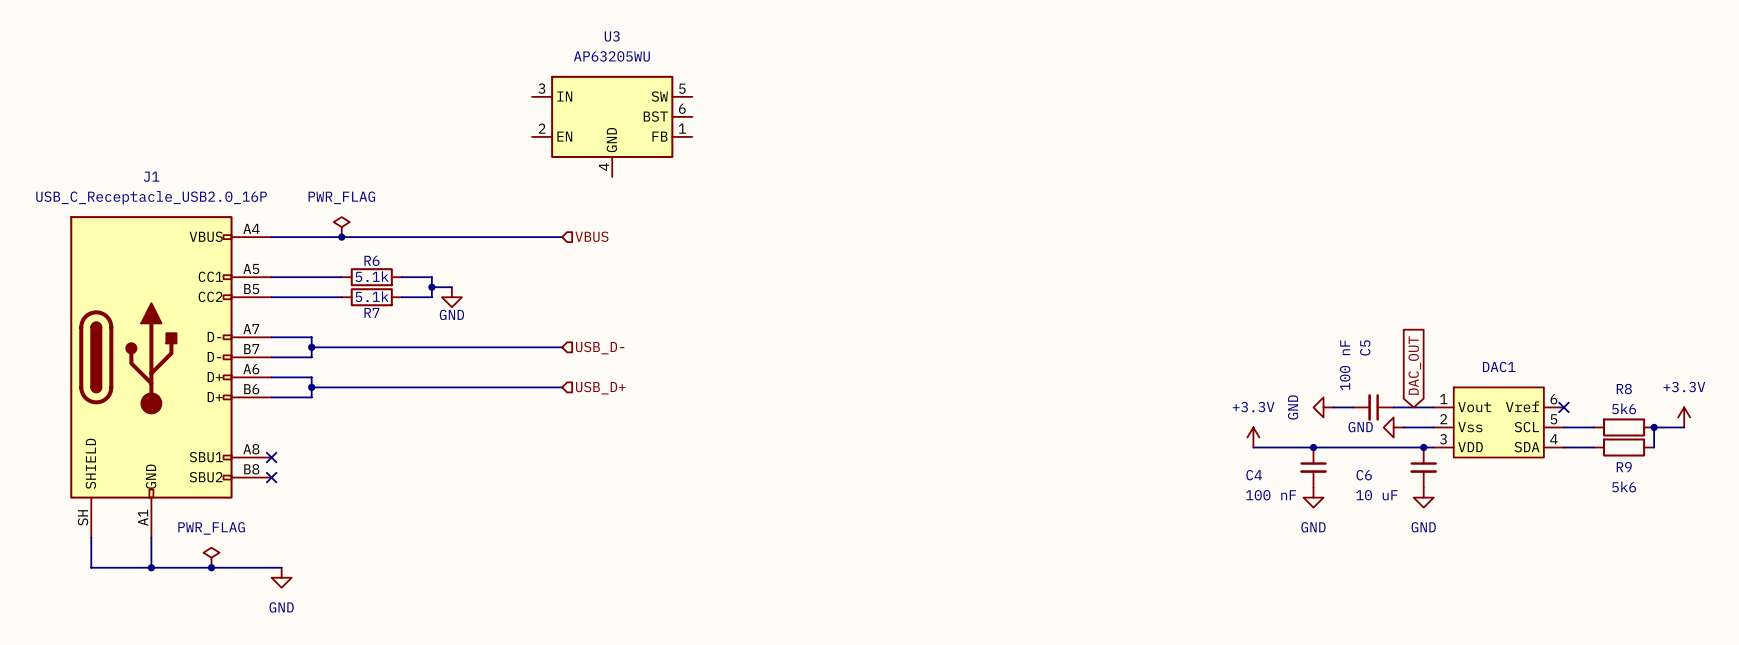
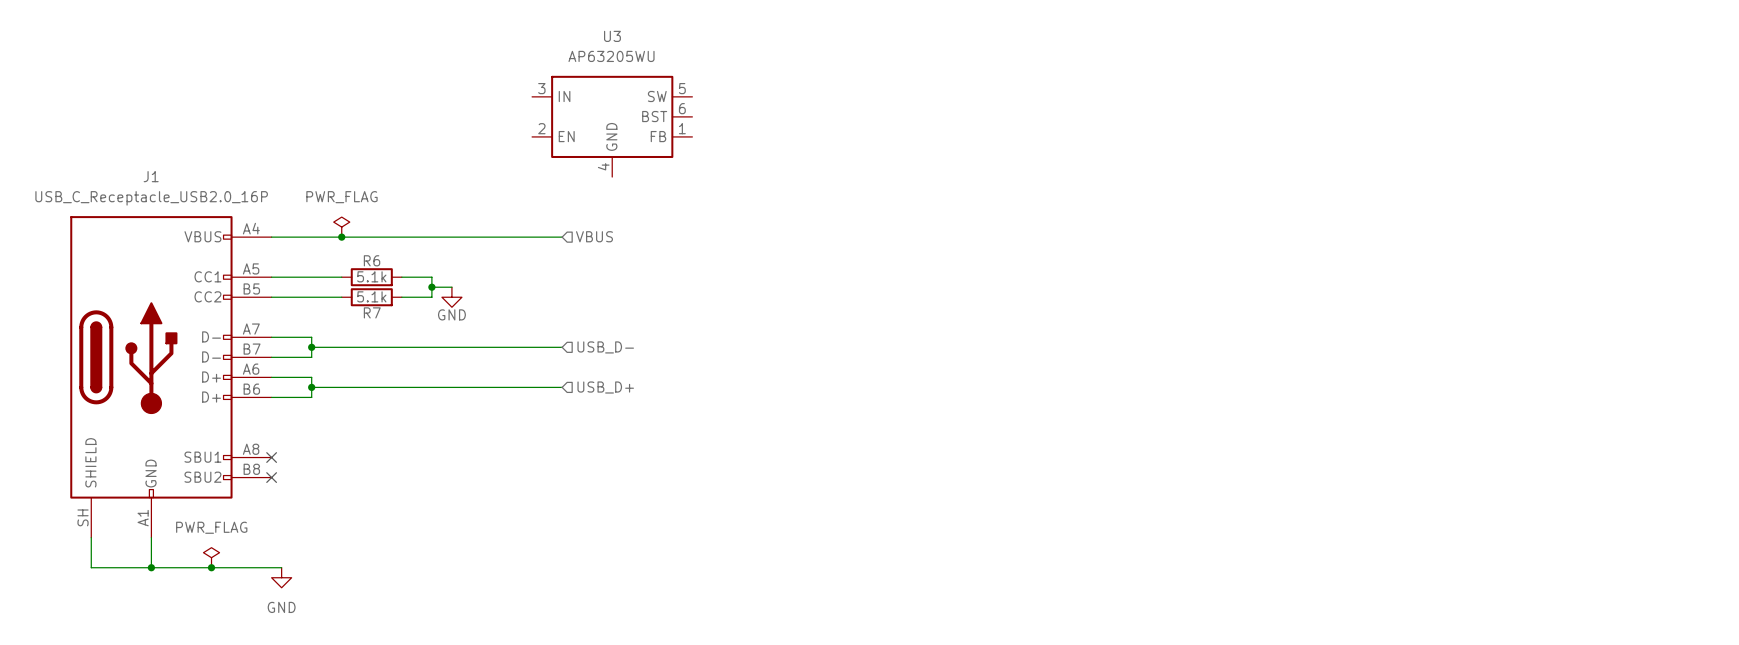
global label: DAC_OUT (1414, 365) -> none
power symbol: GND (1323, 407) -> none
wire: (1333, 407) (1353, 407) -> none
C5: 100 nF (1373, 407) -> none
wire: (1393, 407) (1433, 407) -> none
no-connect mark: (1563, 407) -> none
power symbol: +3.3V (1684, 417) -> none
DAC1: (1498, 422) -> none
power symbol: GND (1393, 427) -> none
wire: (1403, 427) (1433, 427) -> none
wire: (1563, 427) (1594, 427) -> none
R8: 5k6 (1624, 427) -> none
junction: (1654, 427) -> none
wire: (1684, 427) (1654, 427) (1654, 447) -> none
power symbol: +3.3V (1253, 437) -> none
wire: (1253, 447) (1433, 447) -> none
junction: (1313, 447) -> none
junction: (1423, 447) -> none
wire: (1563, 447) (1594, 447) -> none
R9: 5k6 (1624, 447) -> none
C4: 100 nF (1313, 467) -> none
C6: 10 uF (1423, 467) -> none
power symbol: GND (1313, 497) -> none
power symbol: GND (1423, 497) -> none

